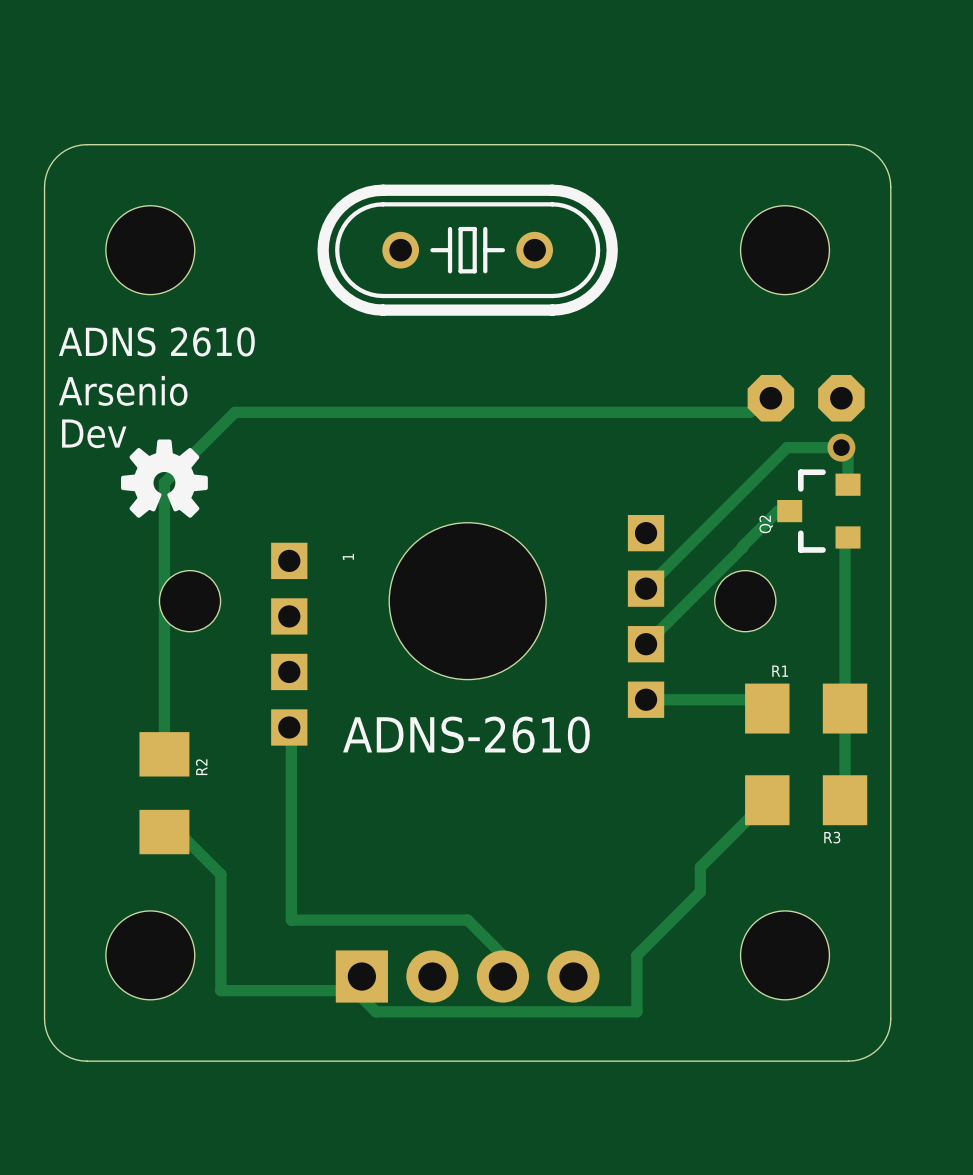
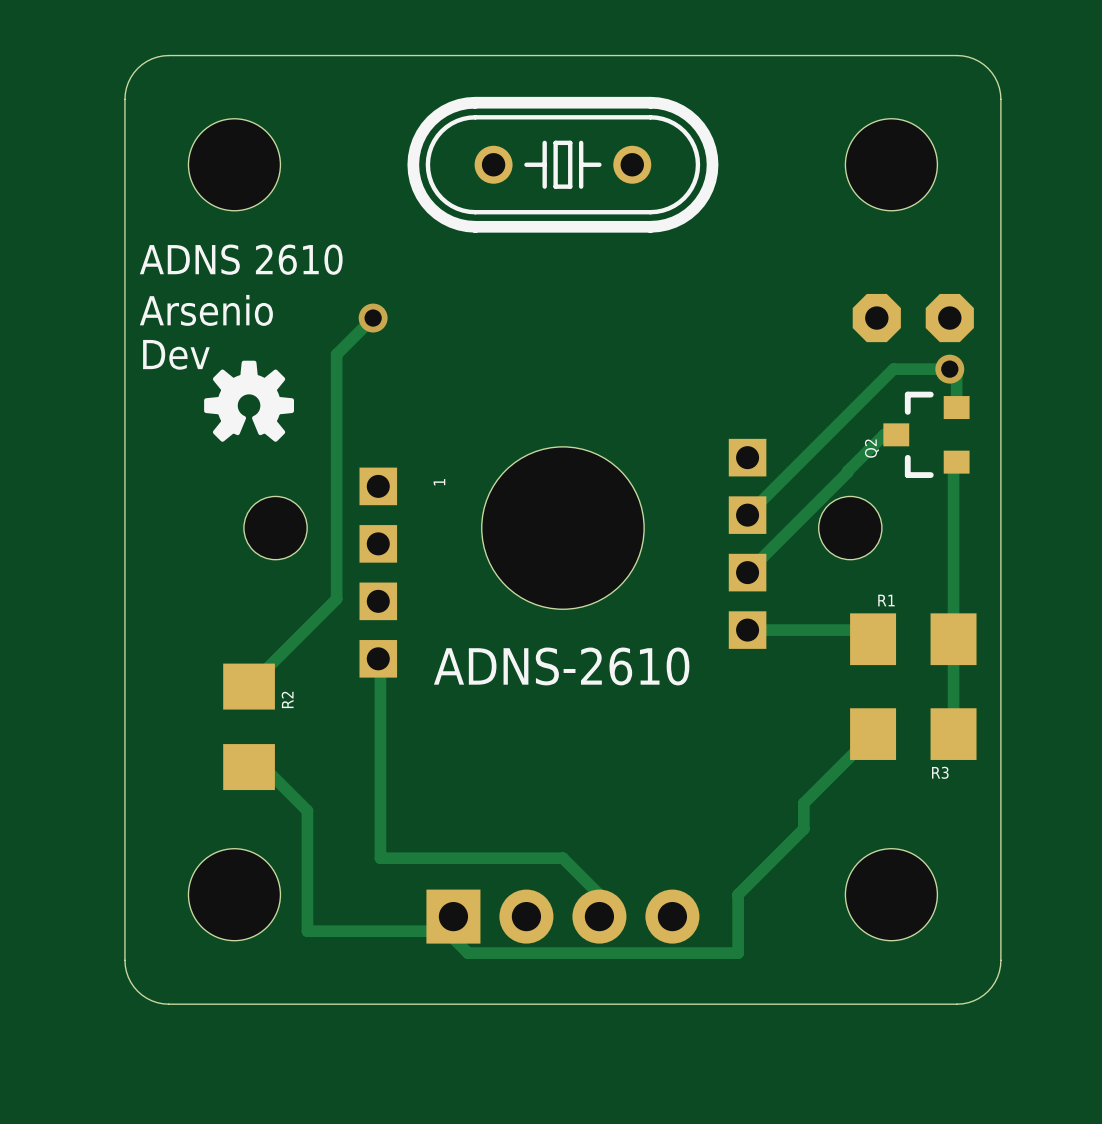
via: none -> (373, 318)
track: (770, 398) (749, 412) (234, 412) (164, 482) (164, 754) -> (373, 318) (336, 354) (336, 598) (249, 686)

